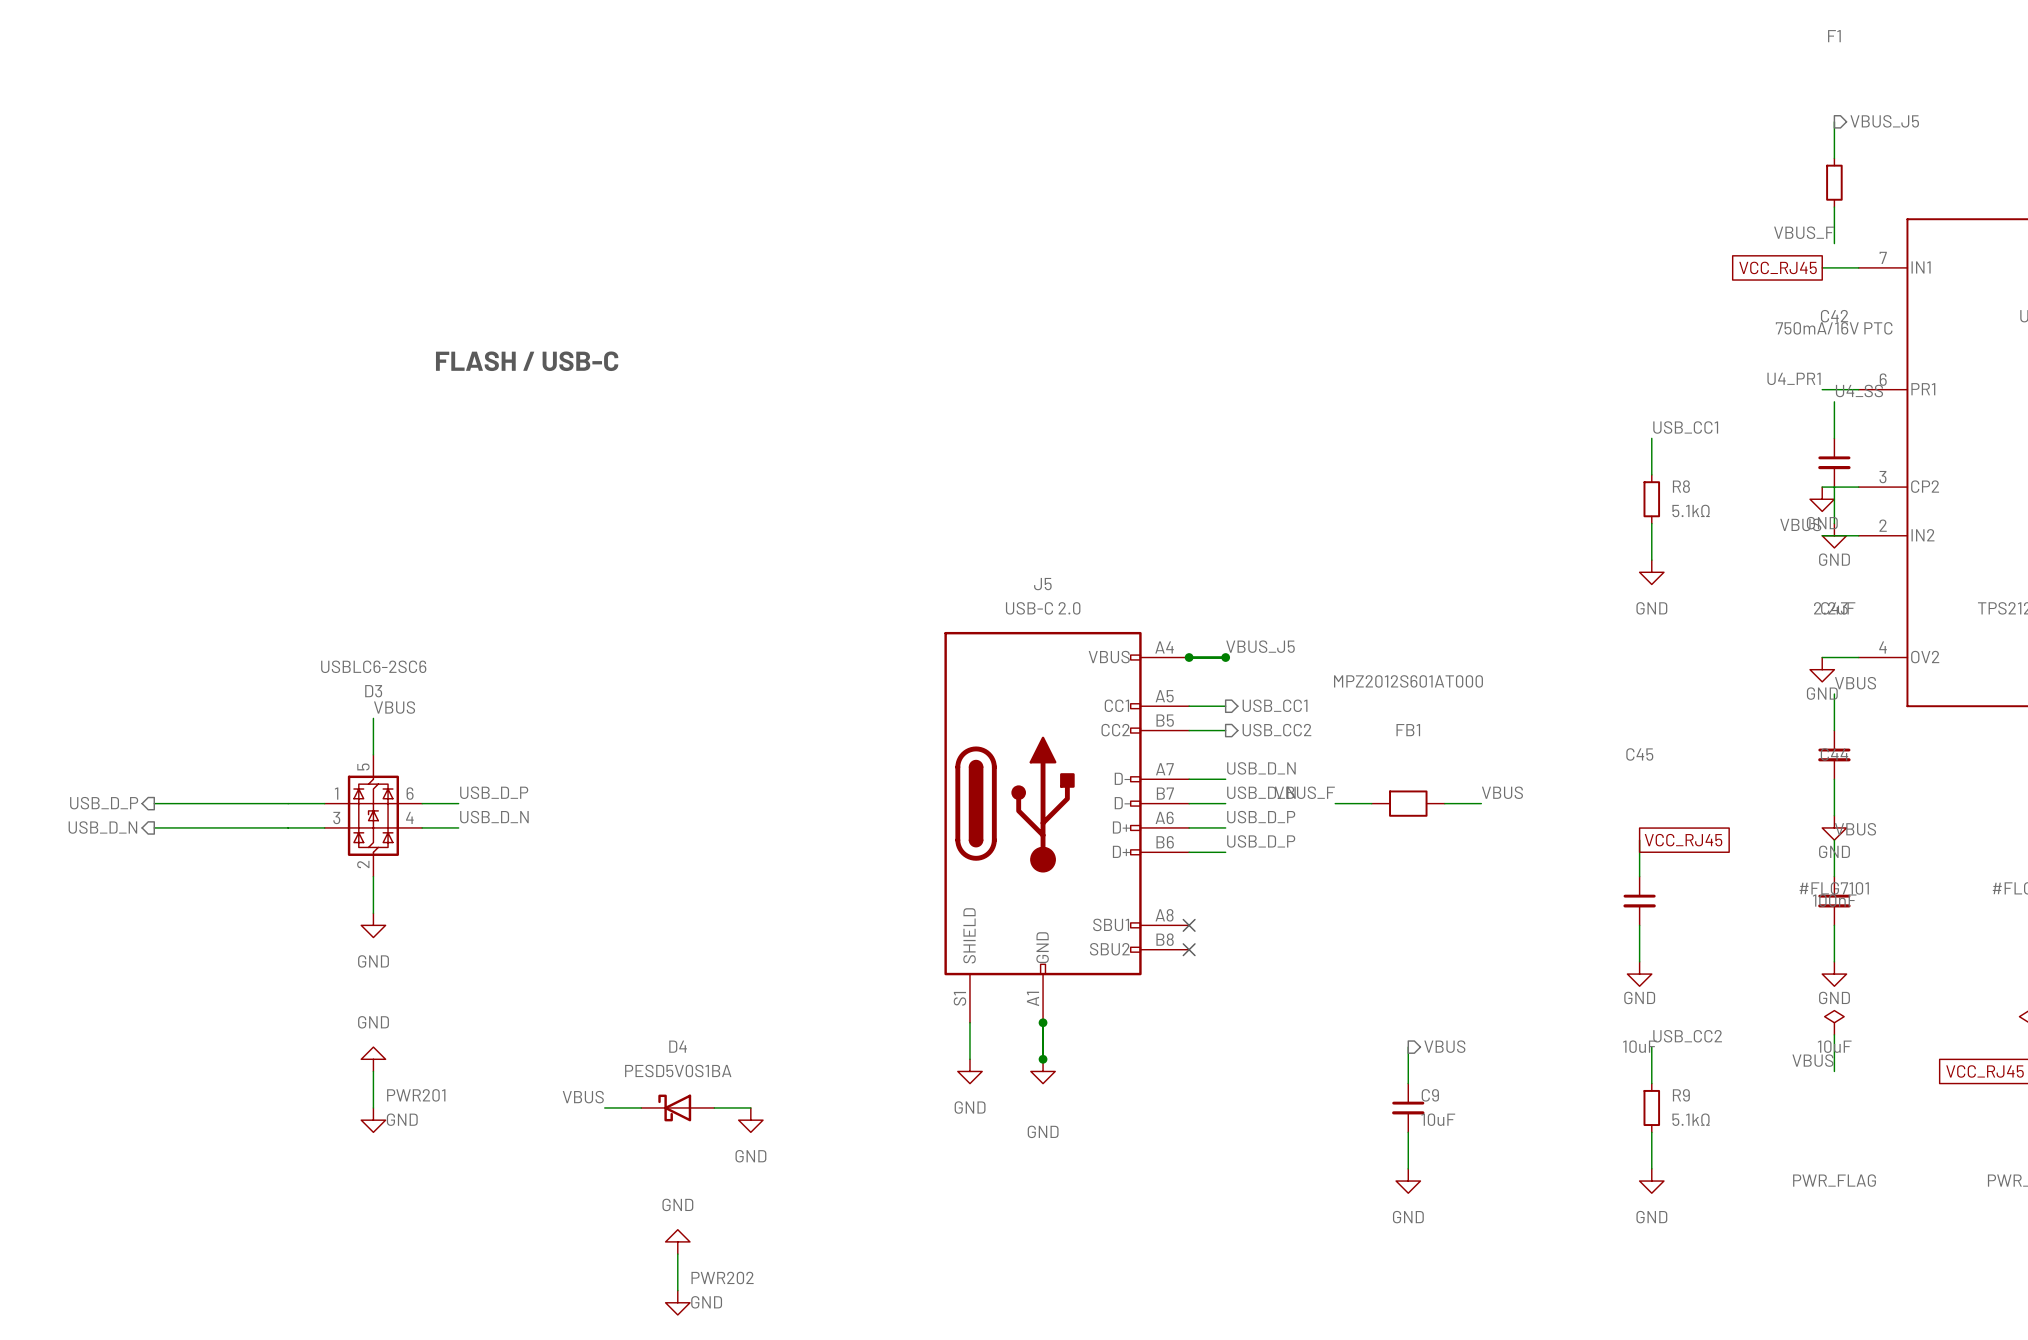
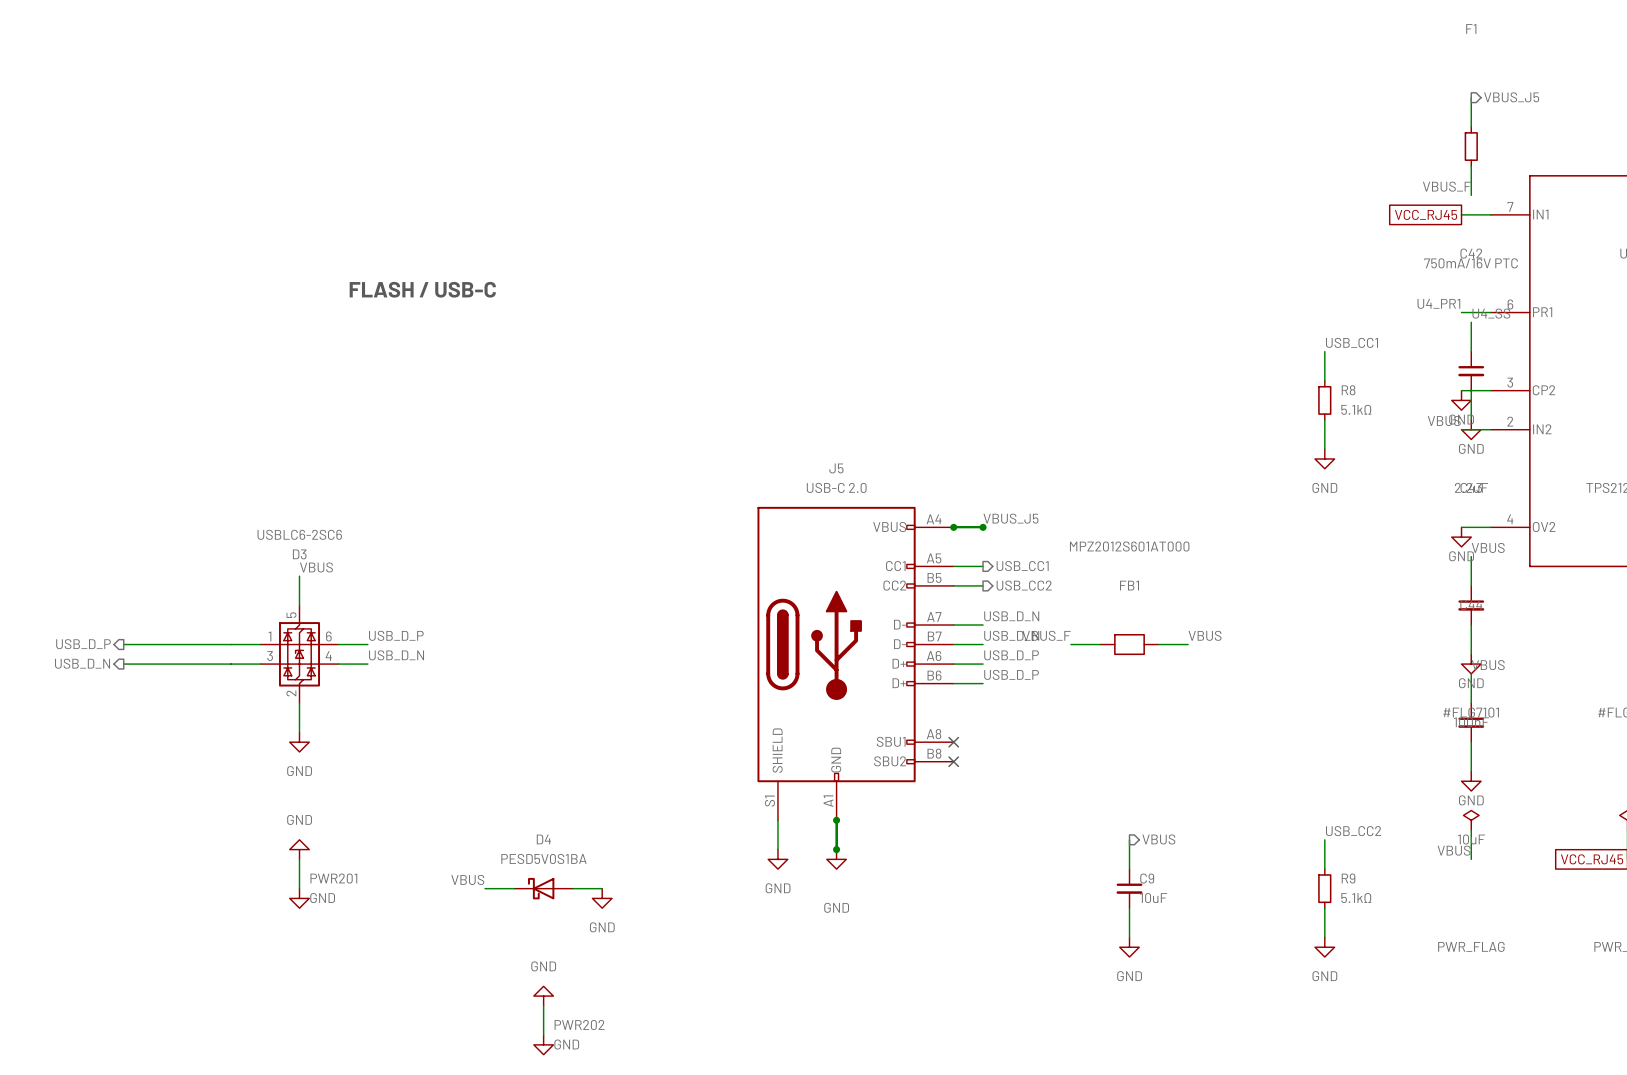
wire: (1639, 840) (1639, 876) -> none
global label: VCC_RJ45 (1683, 840) -> none
C45: 10uF (1639, 901) -> none
wire: (1639, 925) (1639, 961) -> none
power symbol: GND (1639, 974) -> none

